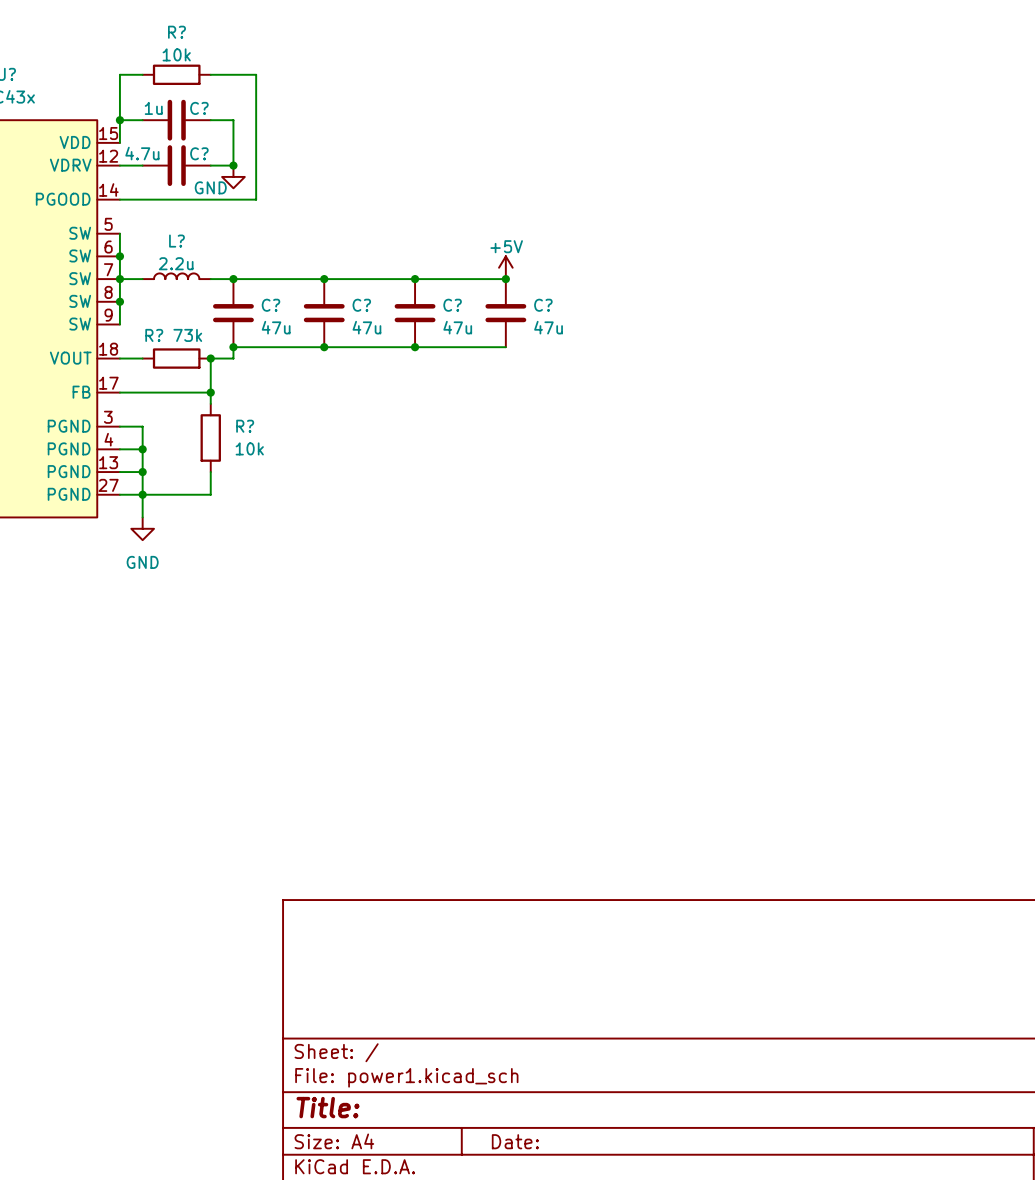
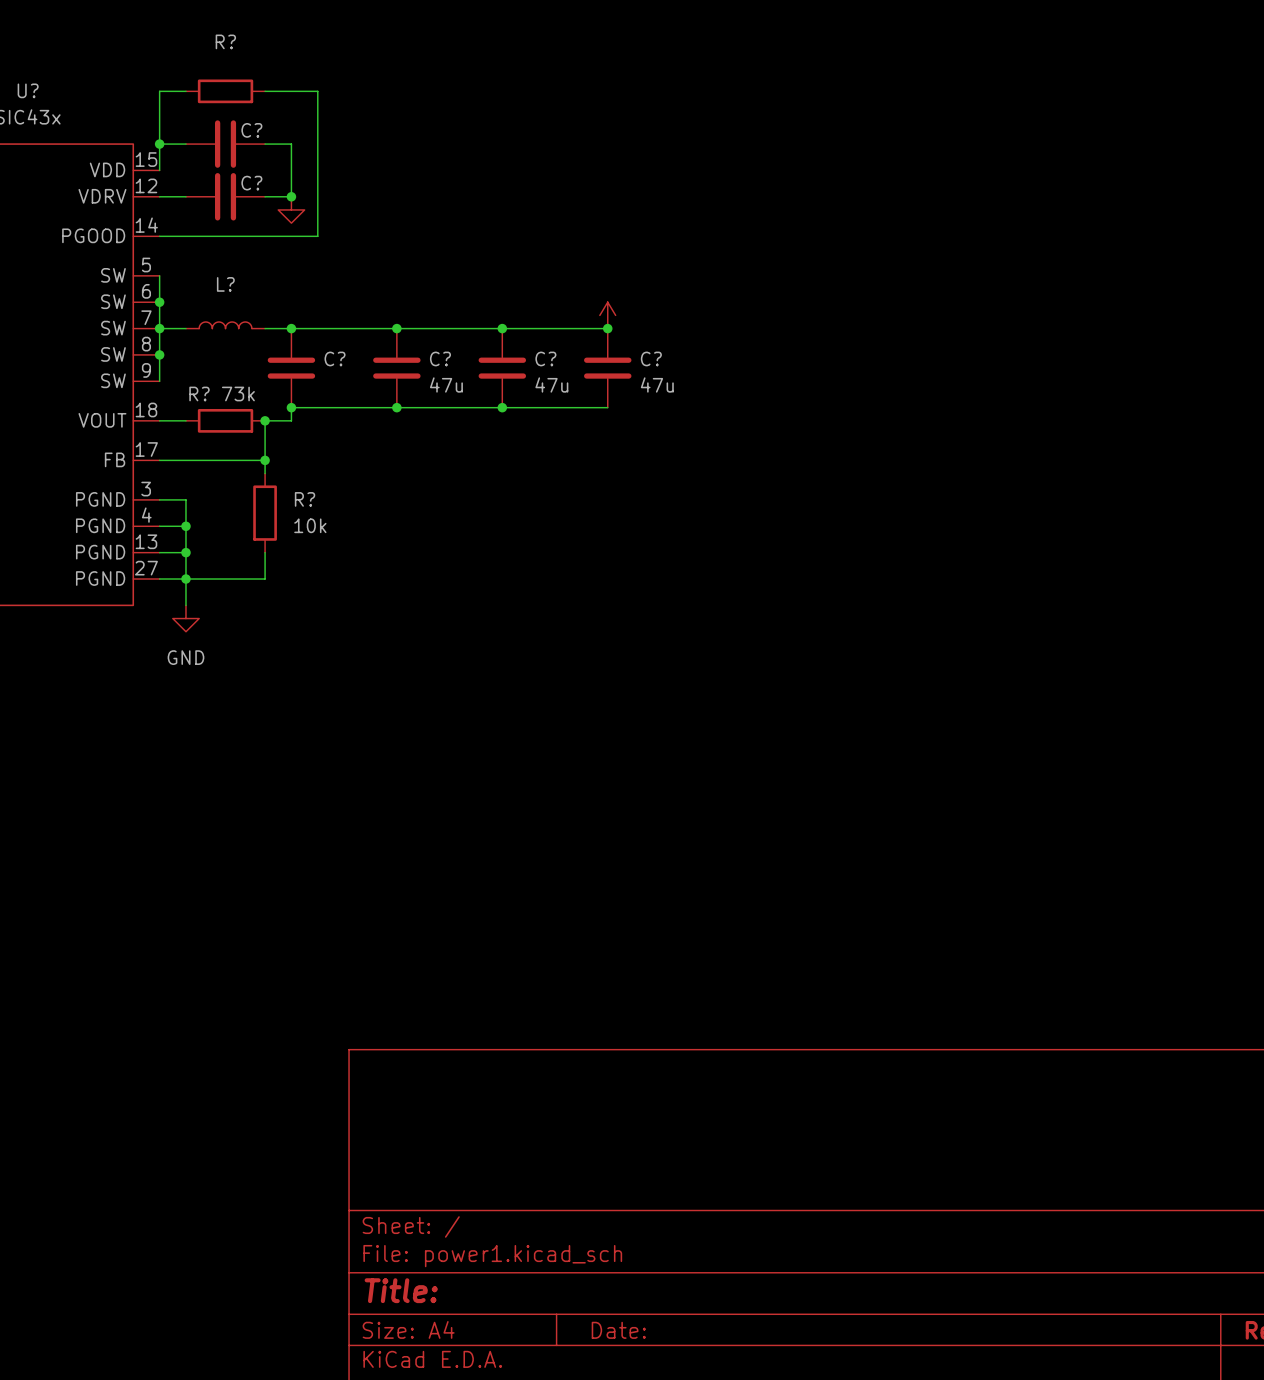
R? value: 10k (176, 54) -> none
C? value: 1u (153, 108) -> none
C? value: 4.7u (142, 153) -> none
power symbol text: GND (210, 187) -> none
power symbol text: +5V (506, 246) -> none
L? value: 2.2u (176, 263) -> none
C? value: 47u (276, 327) -> none

